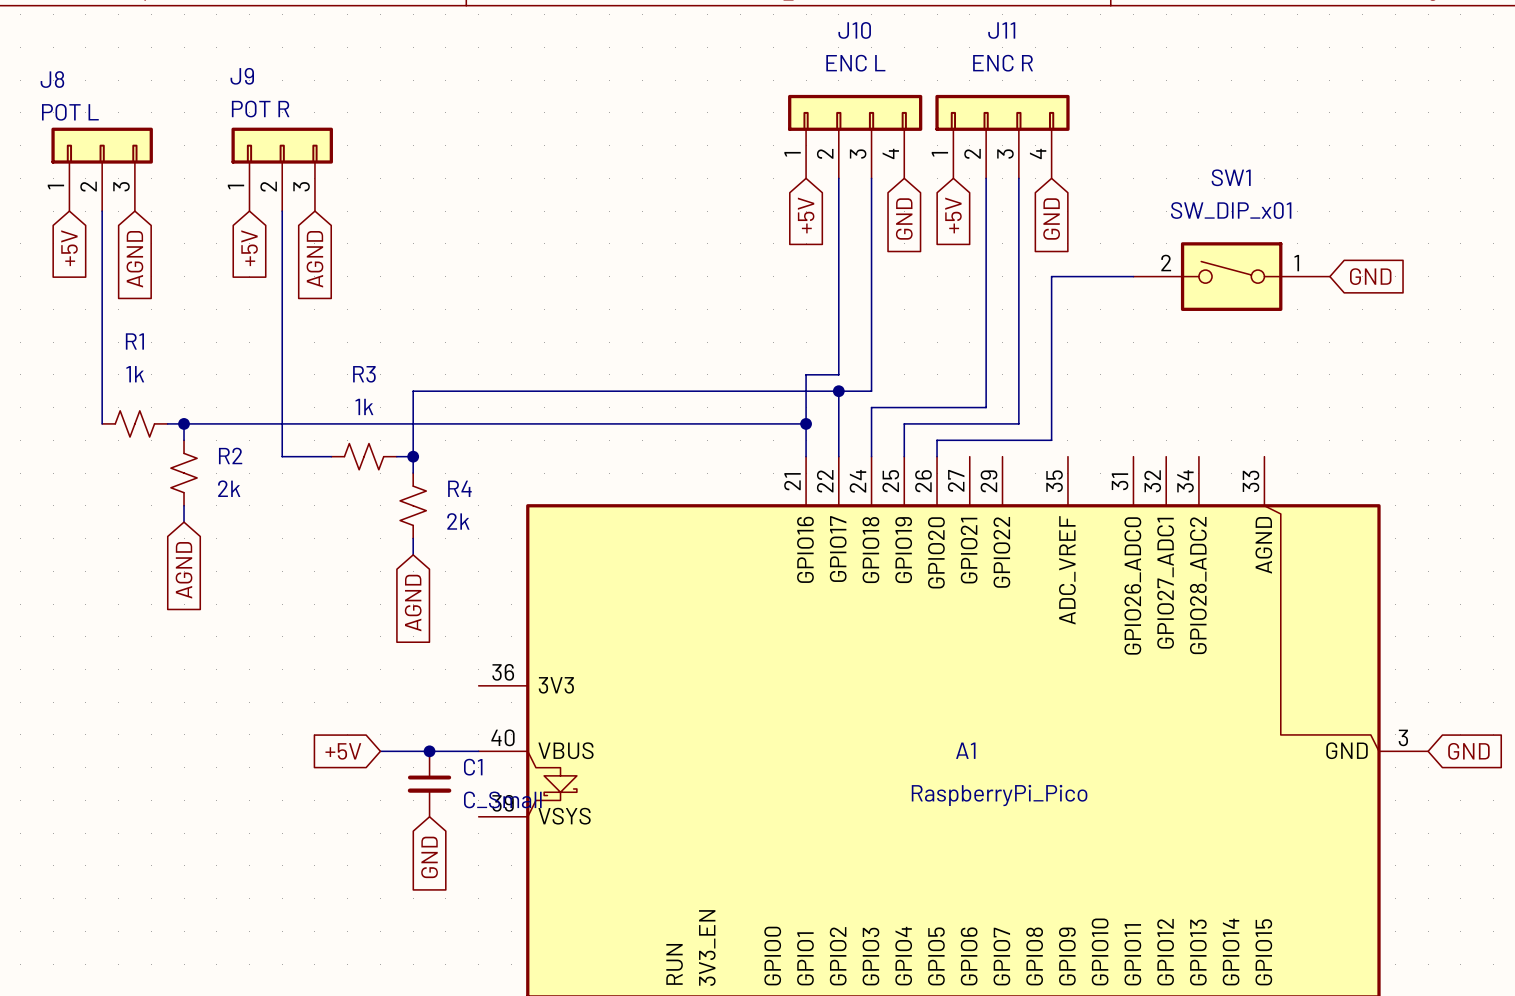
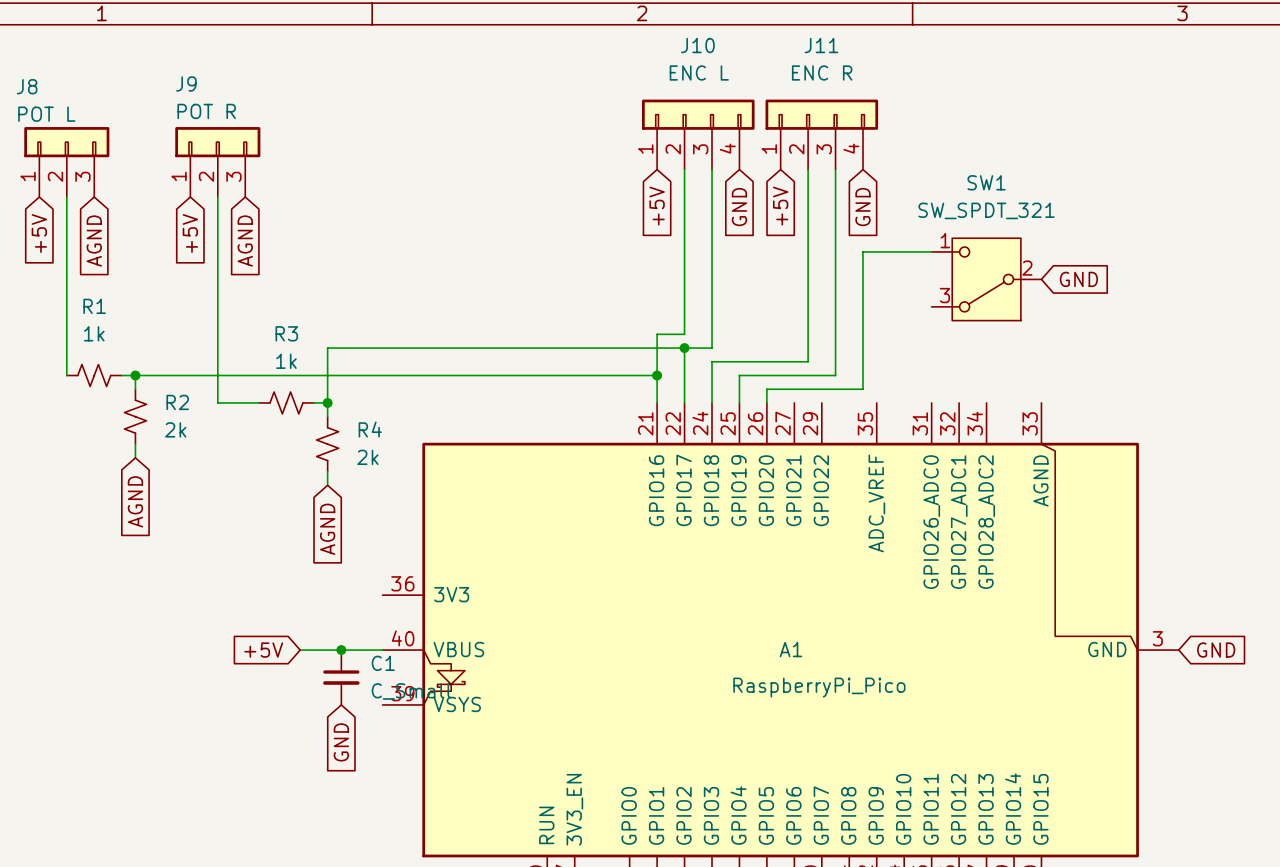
SW1 value: SW_DIP_x01 (1231, 210) -> SW_SPDT_321 (986, 210)
SW1 symbol: [1133, 242, 1330, 311] -> [931, 238, 1042, 321]
global label position: GND (1370, 276) -> GND (1078, 279)

